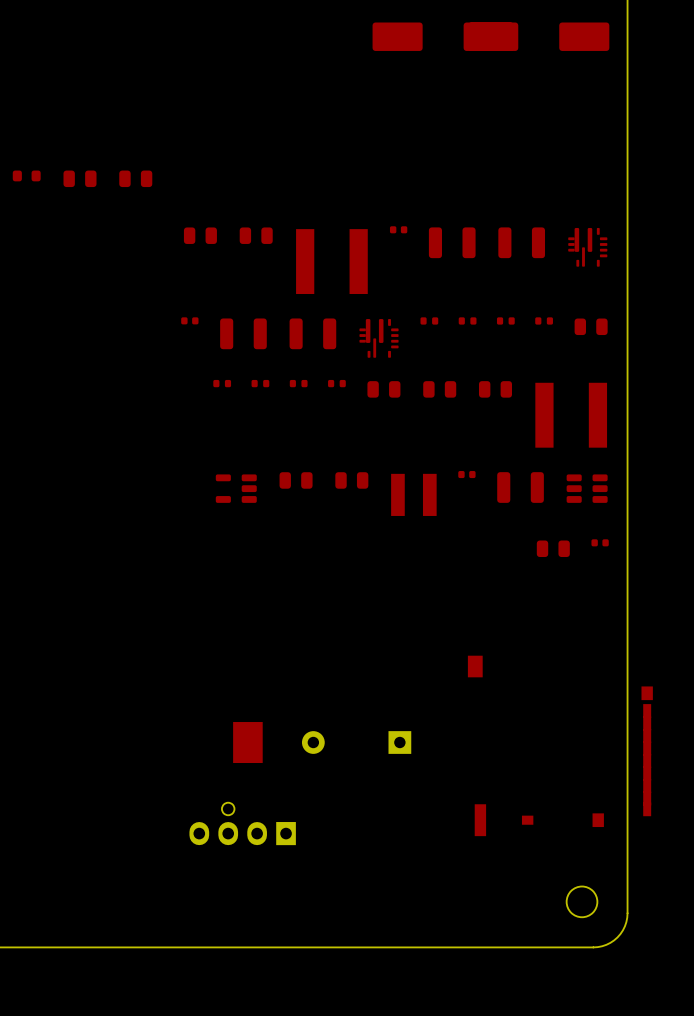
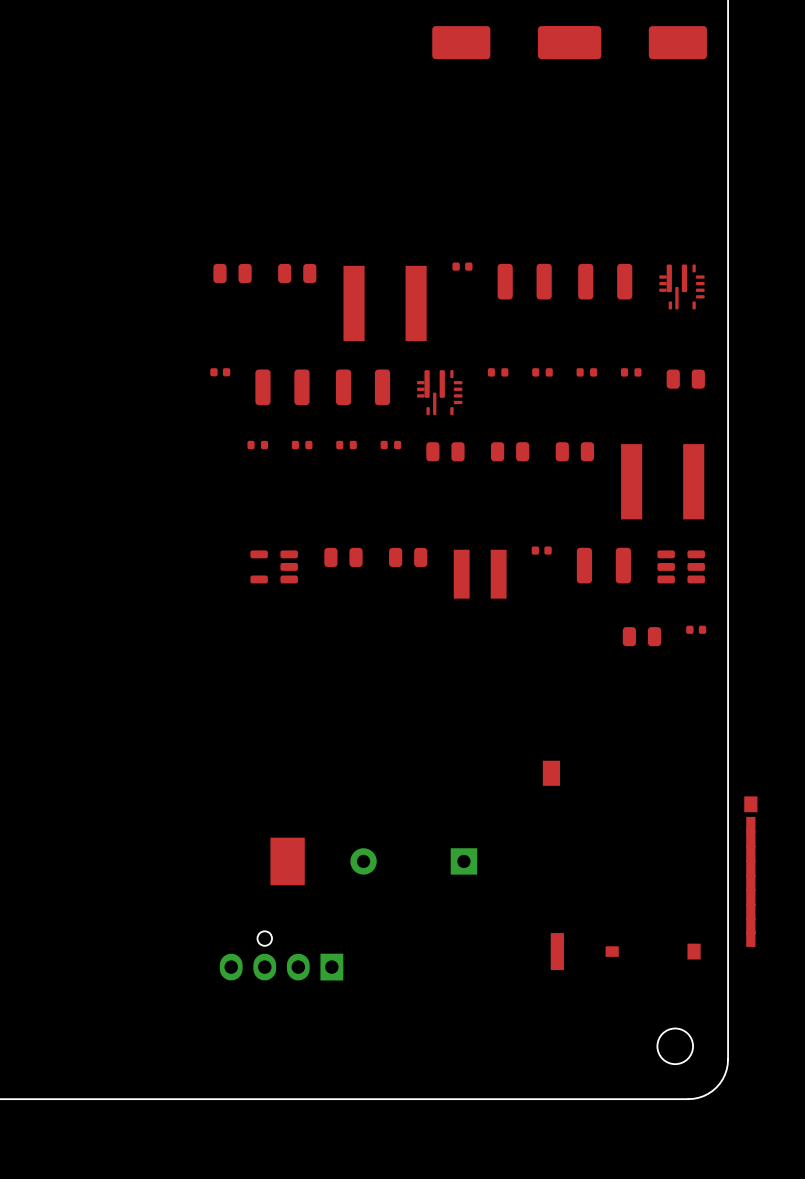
part: (26, 175) -> none
part: (80, 178) -> none
part: (135, 178) -> none

